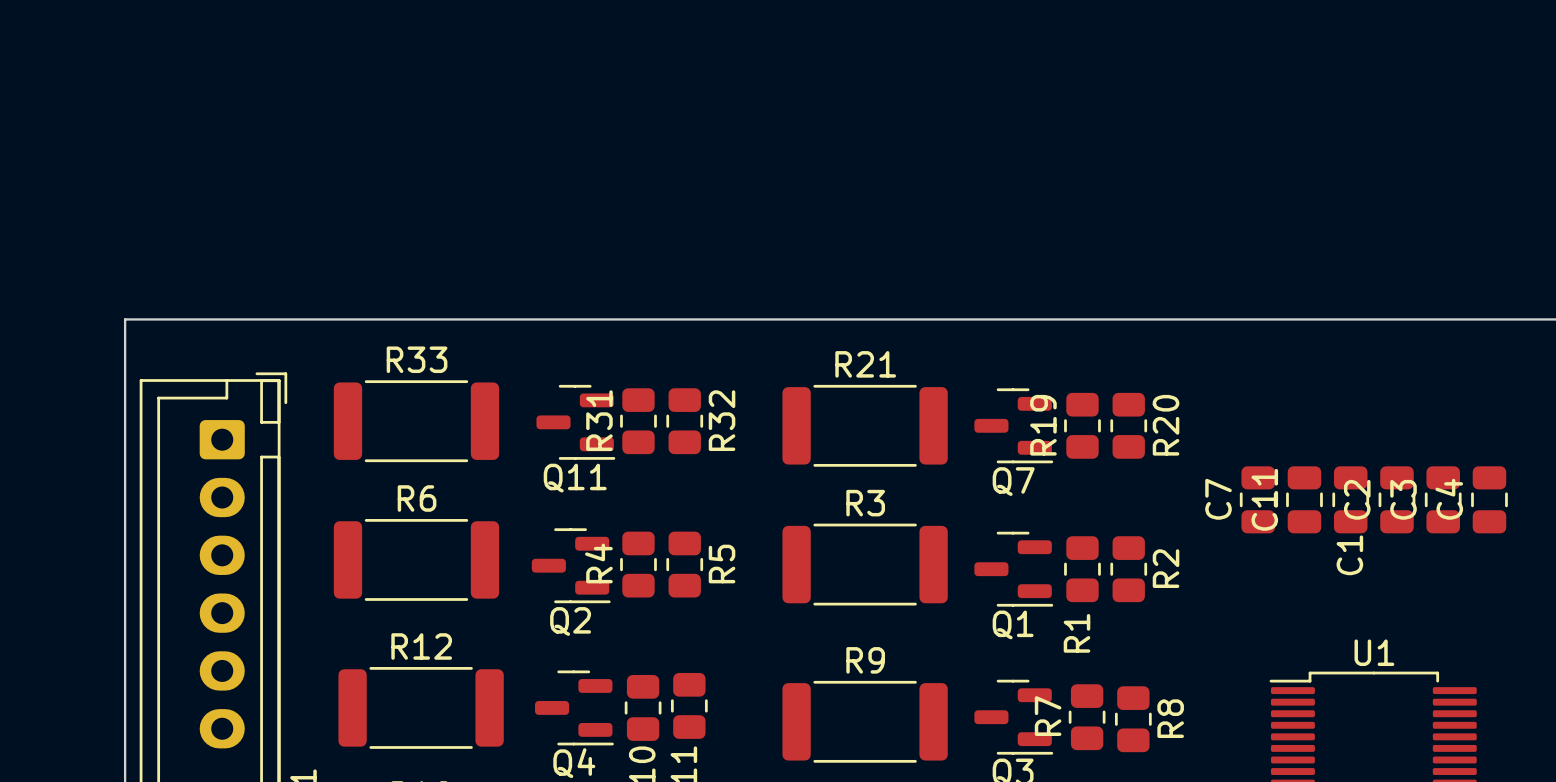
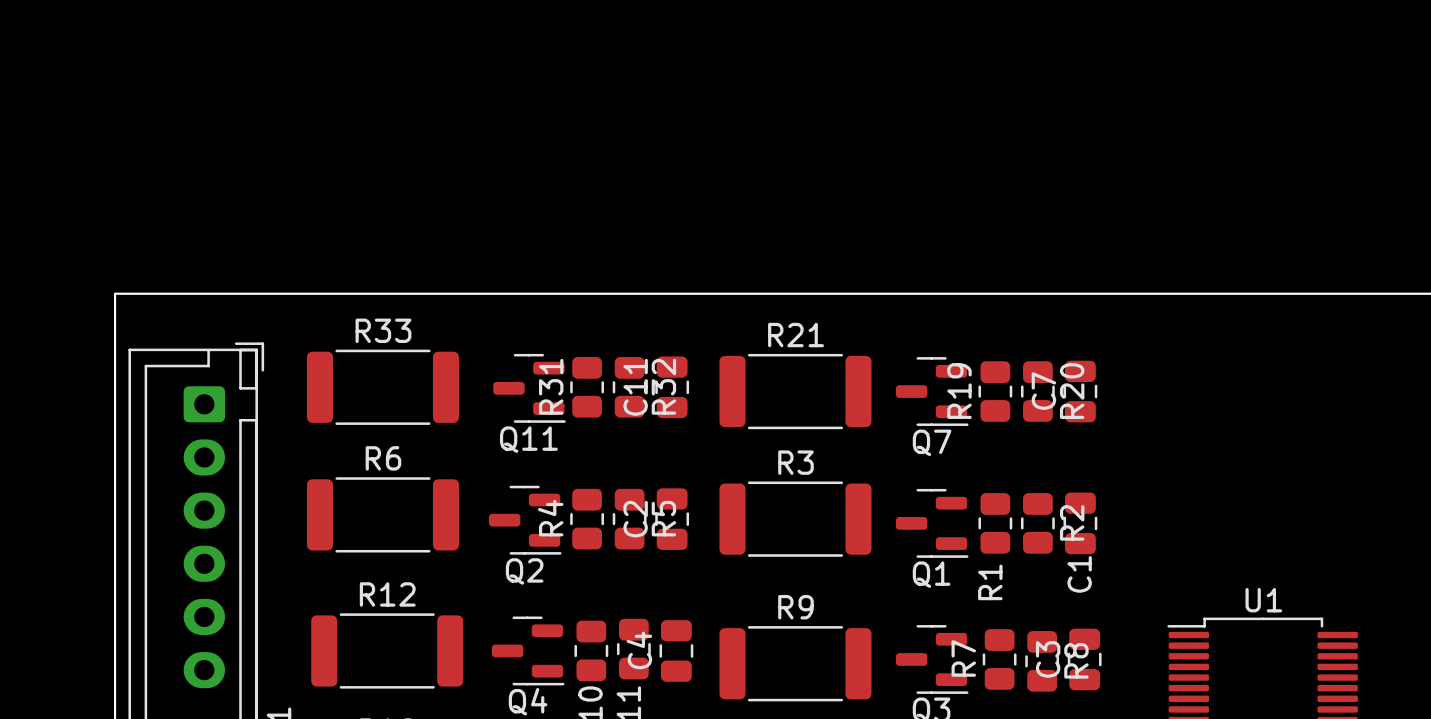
C7 position: (1258, 499) -> (1080, 391)
C11 position: (1304, 499) -> (672, 387)
C1 position: (1350, 499) -> (1080, 523)
C2 position: (1396, 499) -> (672, 519)
C3 position: (1443, 499) -> (1084, 659)
C4 position: (1489, 499) -> (676, 650)

